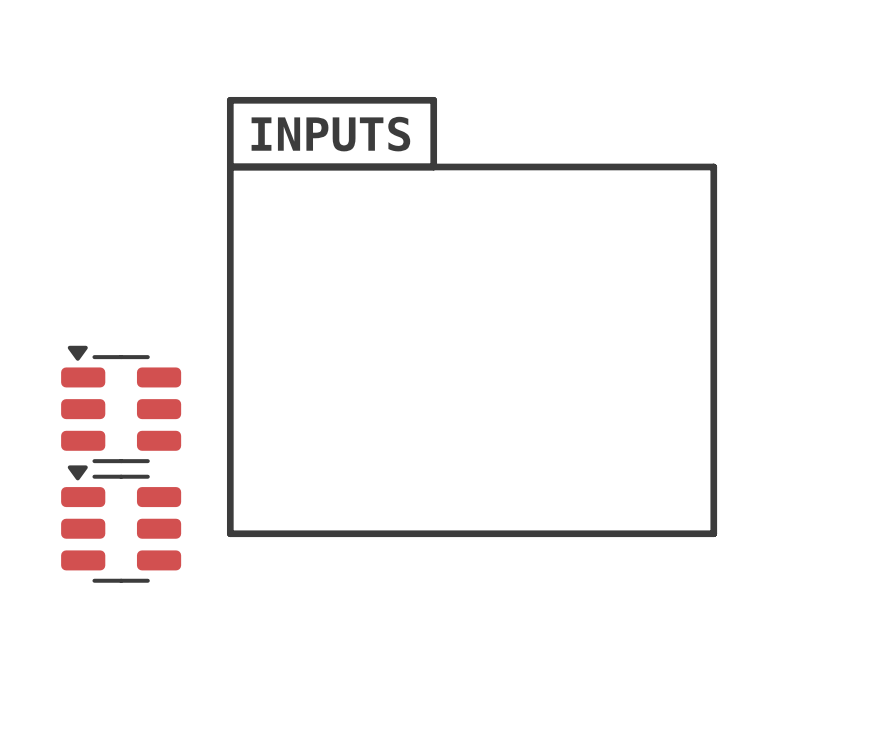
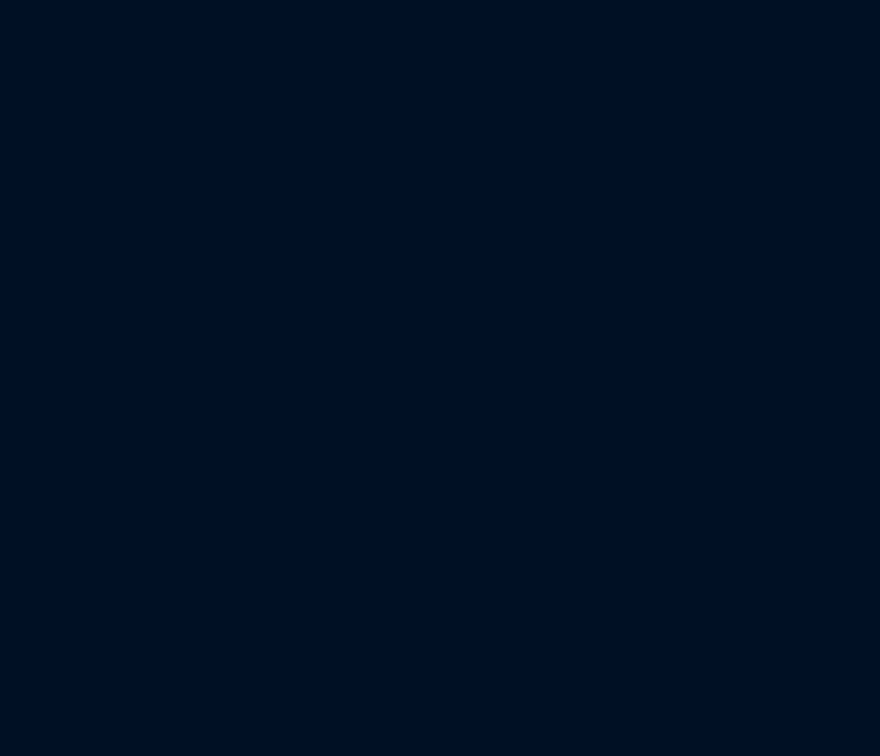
text: INPUTS (330, 134) -> none
line: (230, 166) (713, 166) (713, 533) (230, 533) (230, 100) (433, 100) (433, 166) -> none
part: (121, 404) -> none
part: (121, 524) -> none

